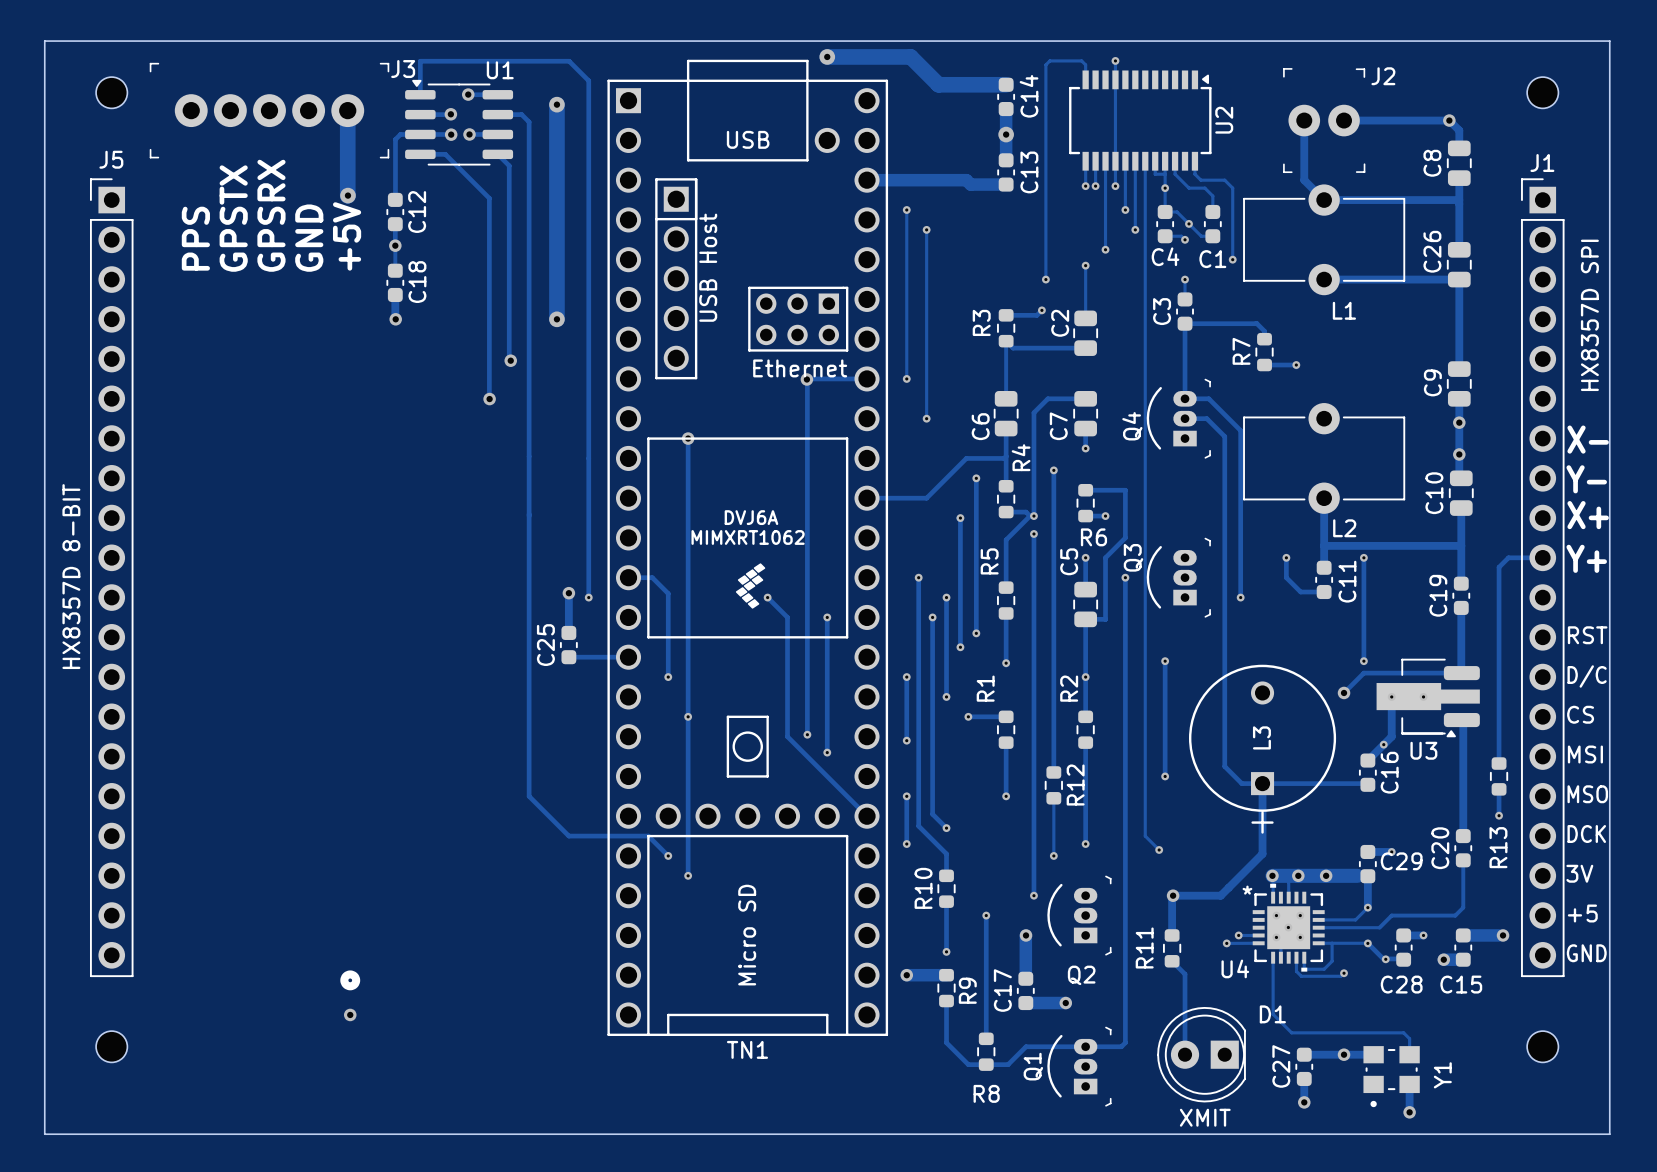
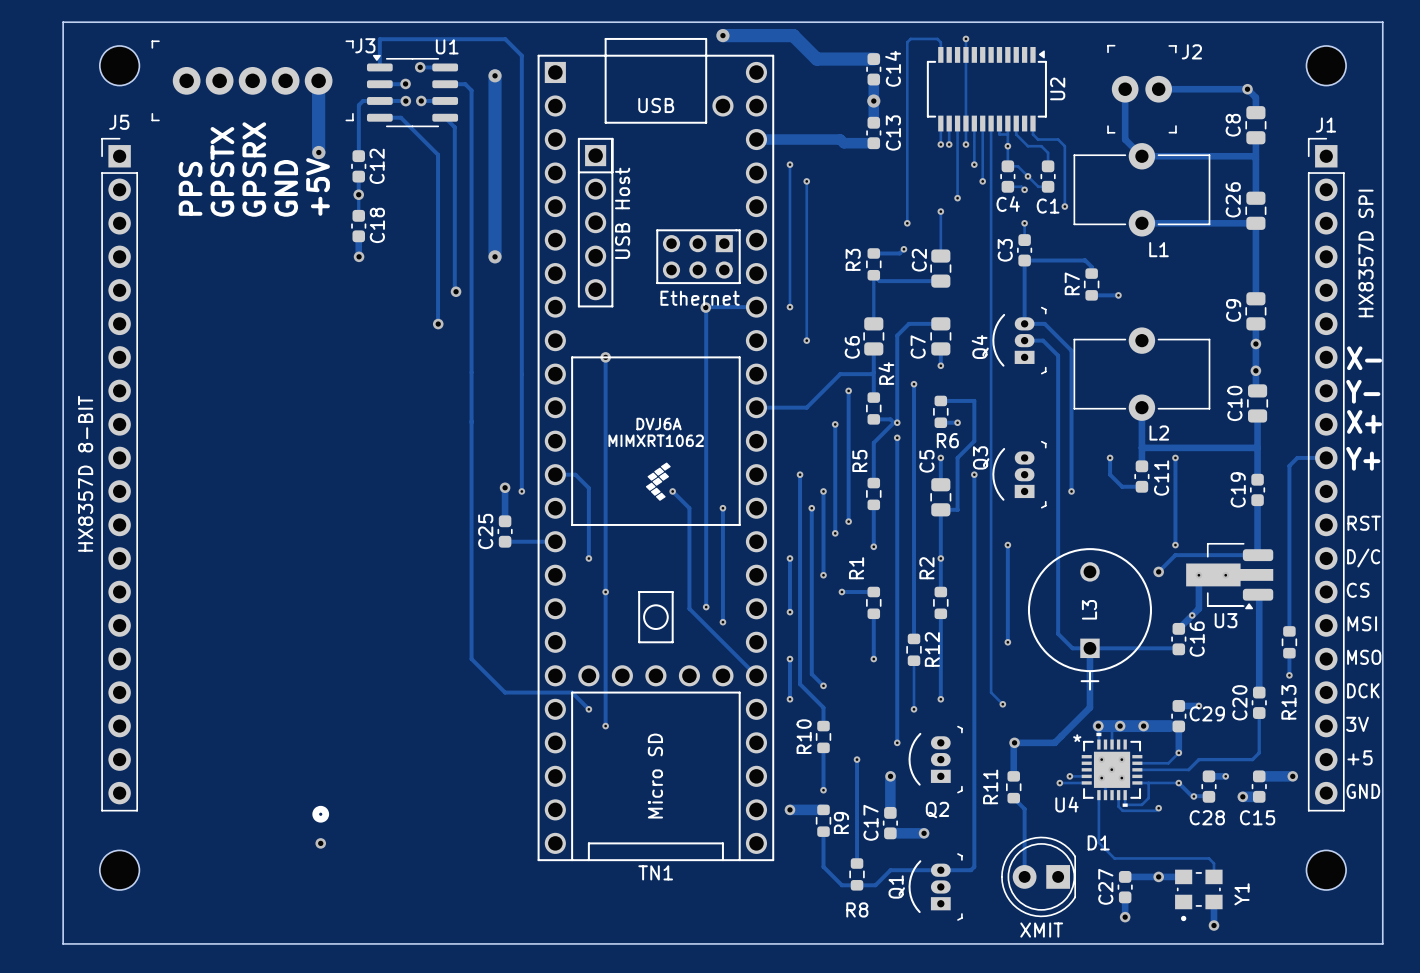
part footprint: [96, 77, 128, 109] -> [99, 45, 140, 86]
part footprint: [1527, 77, 1559, 109] -> [1306, 45, 1347, 86]
part footprint: [96, 1031, 128, 1063] -> [99, 850, 140, 891]
part footprint: [1527, 1031, 1559, 1063] -> [1306, 850, 1347, 891]

